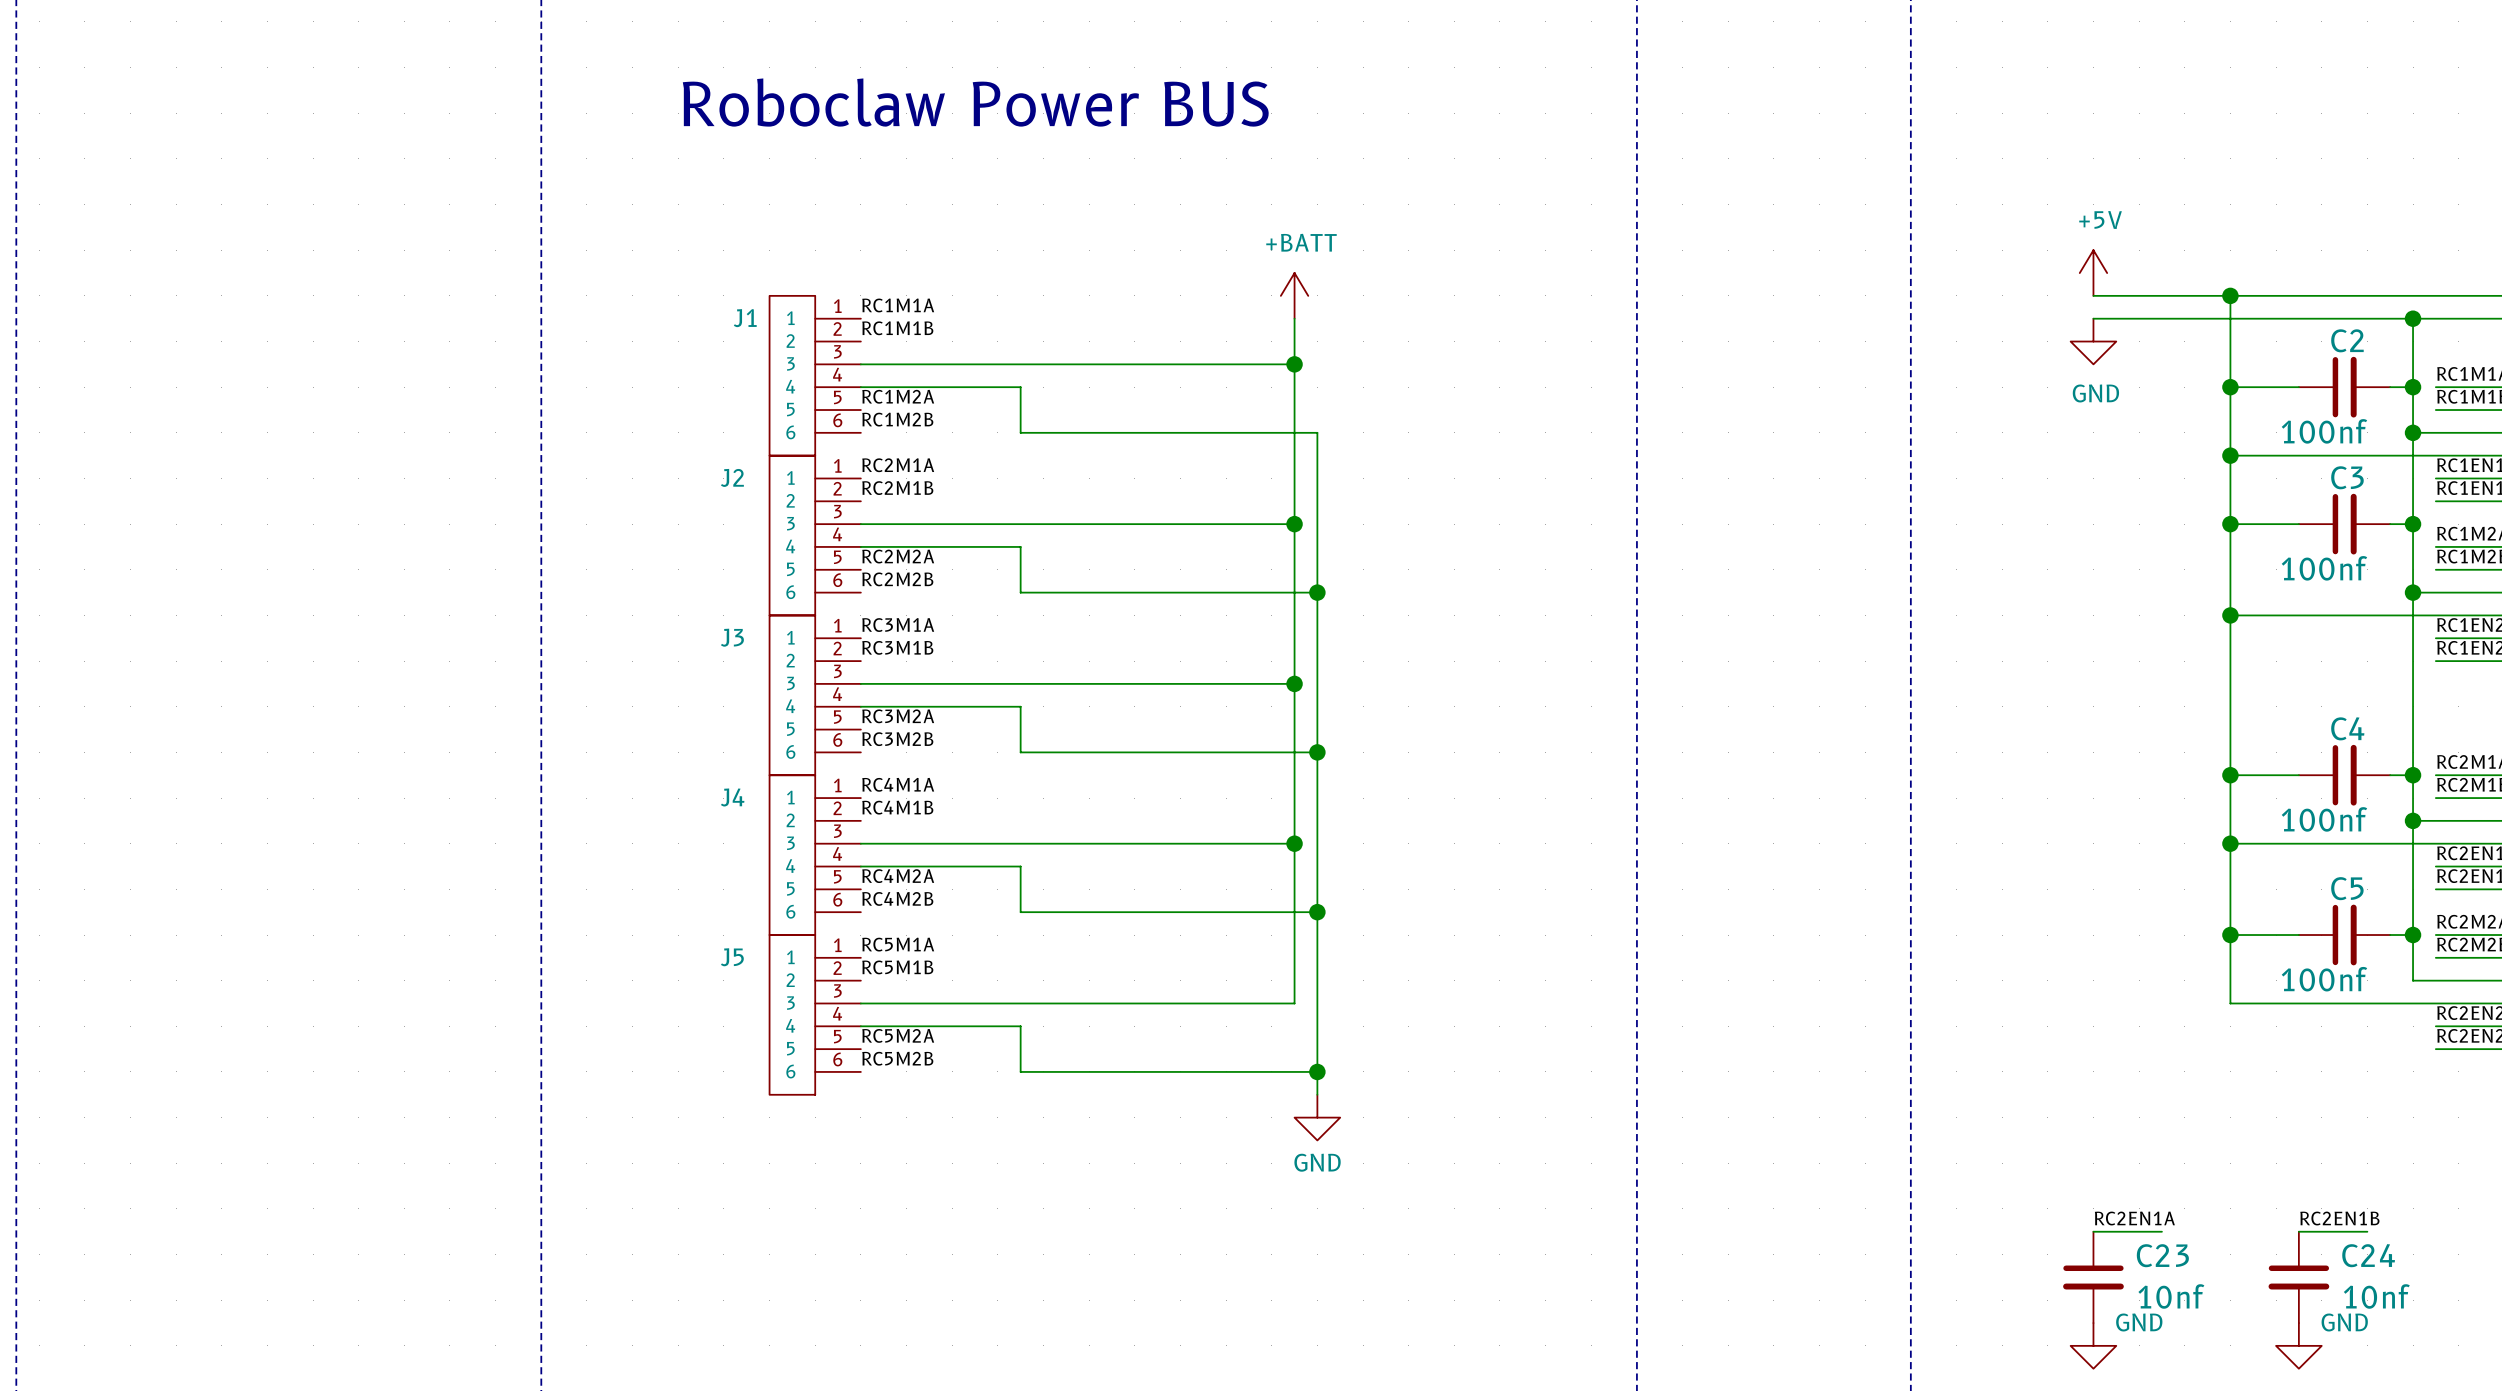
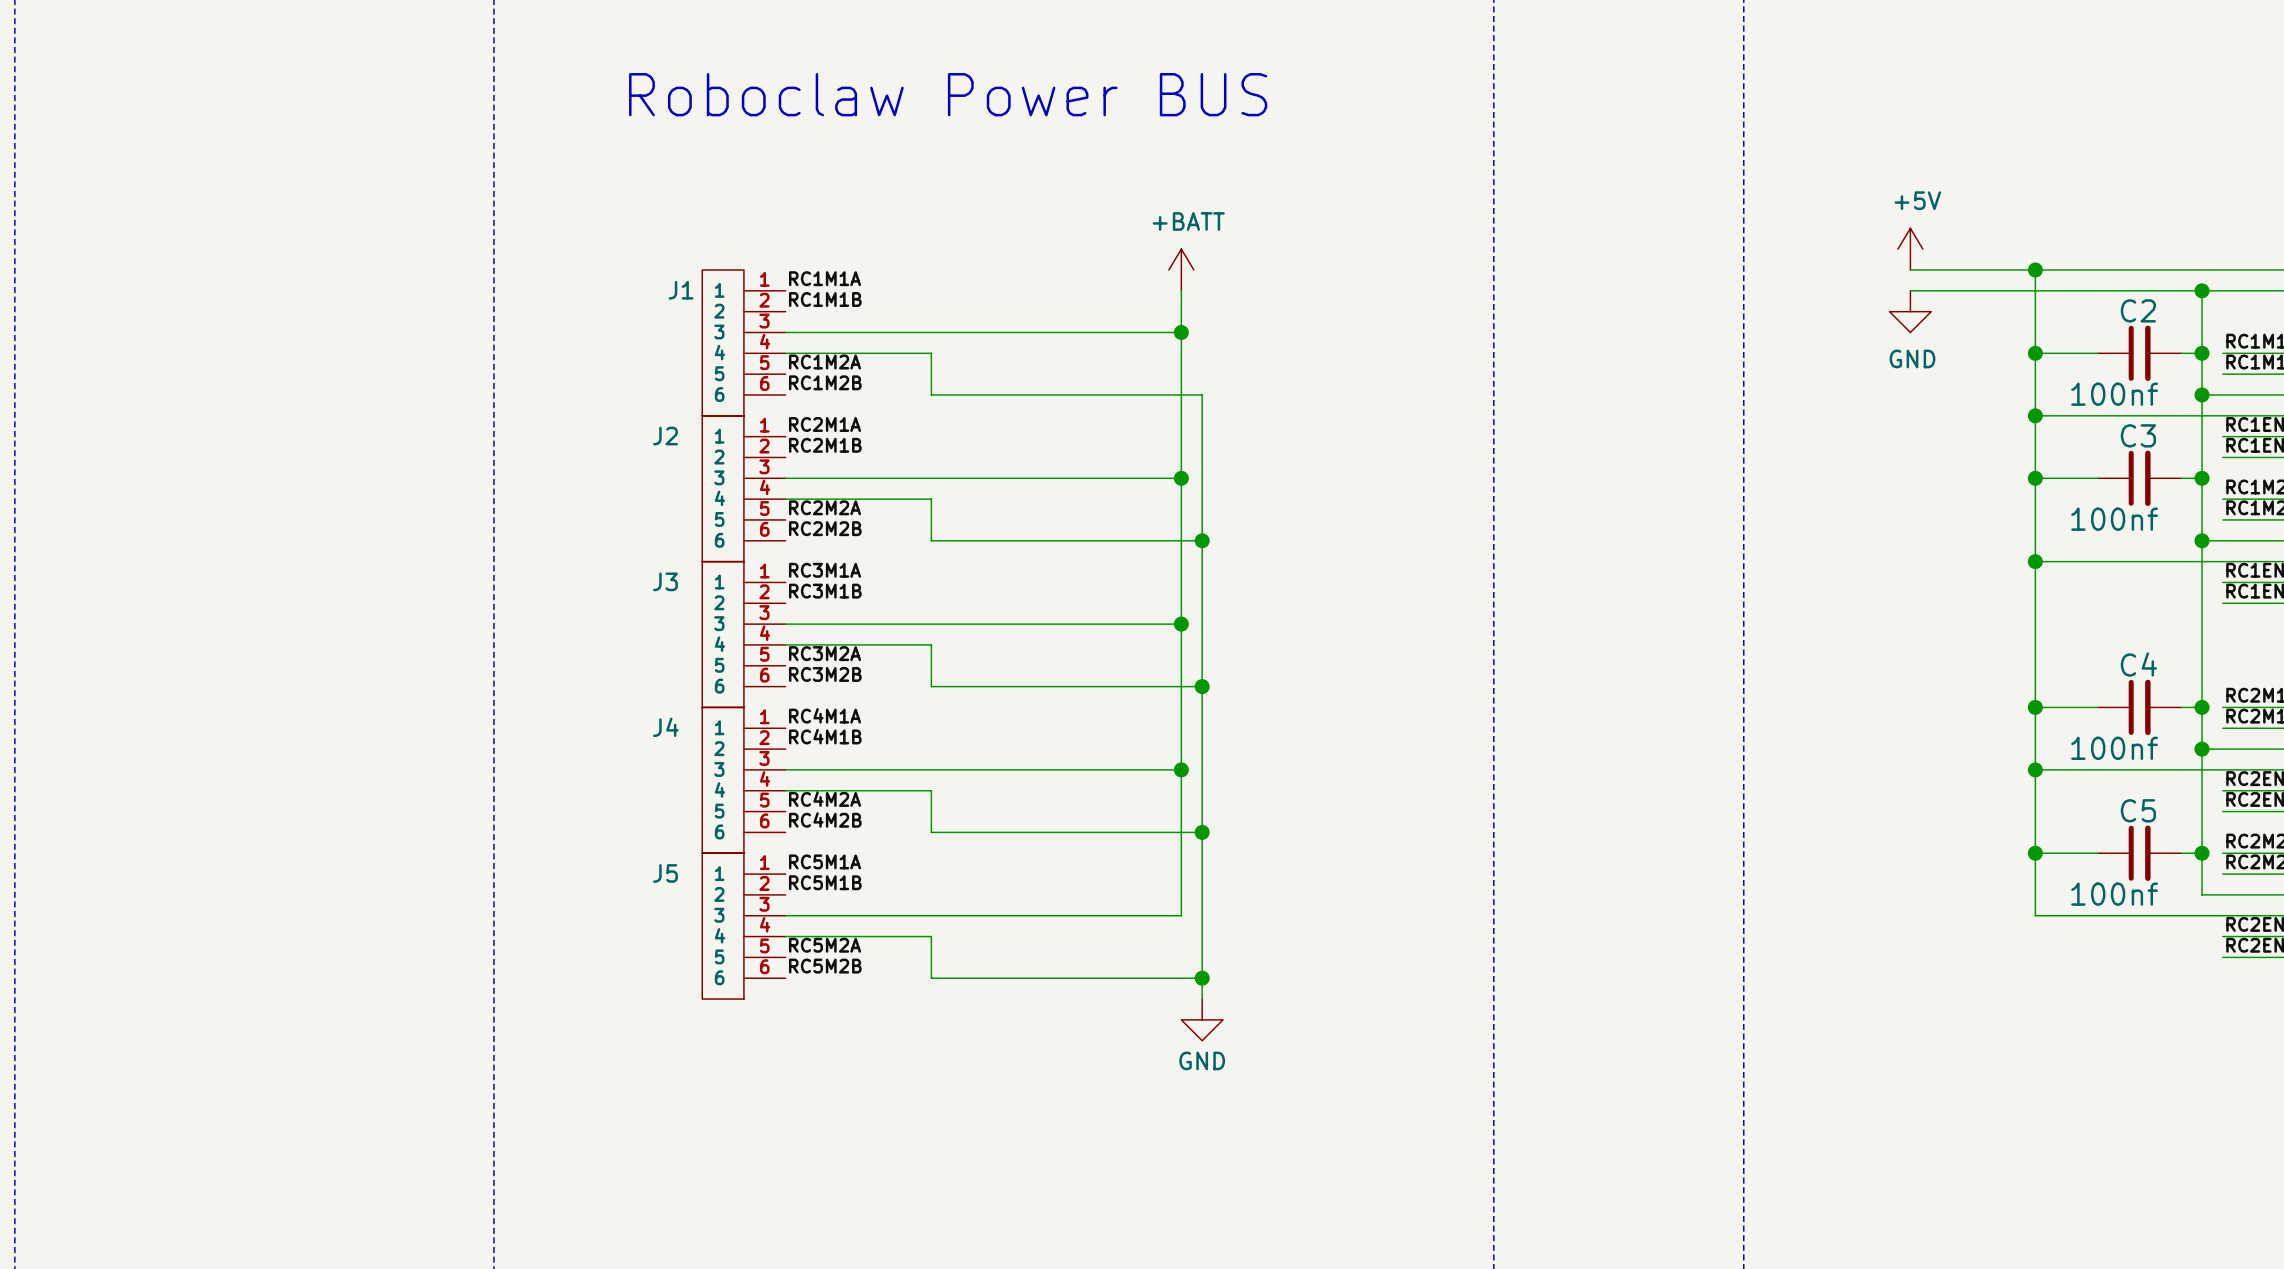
label: RC2EN1A (2134, 1218) -> none
label: RC2EN1B (2339, 1218) -> none
wire: (2093, 1231) (2161, 1231) -> none
wire: (2298, 1231) (2367, 1231) -> none
C23: 10nf (2093, 1277) -> none
C24: 10nf (2298, 1277) -> none
power symbol: GND (2093, 1345) -> none
power symbol: GND (2298, 1345) -> none

